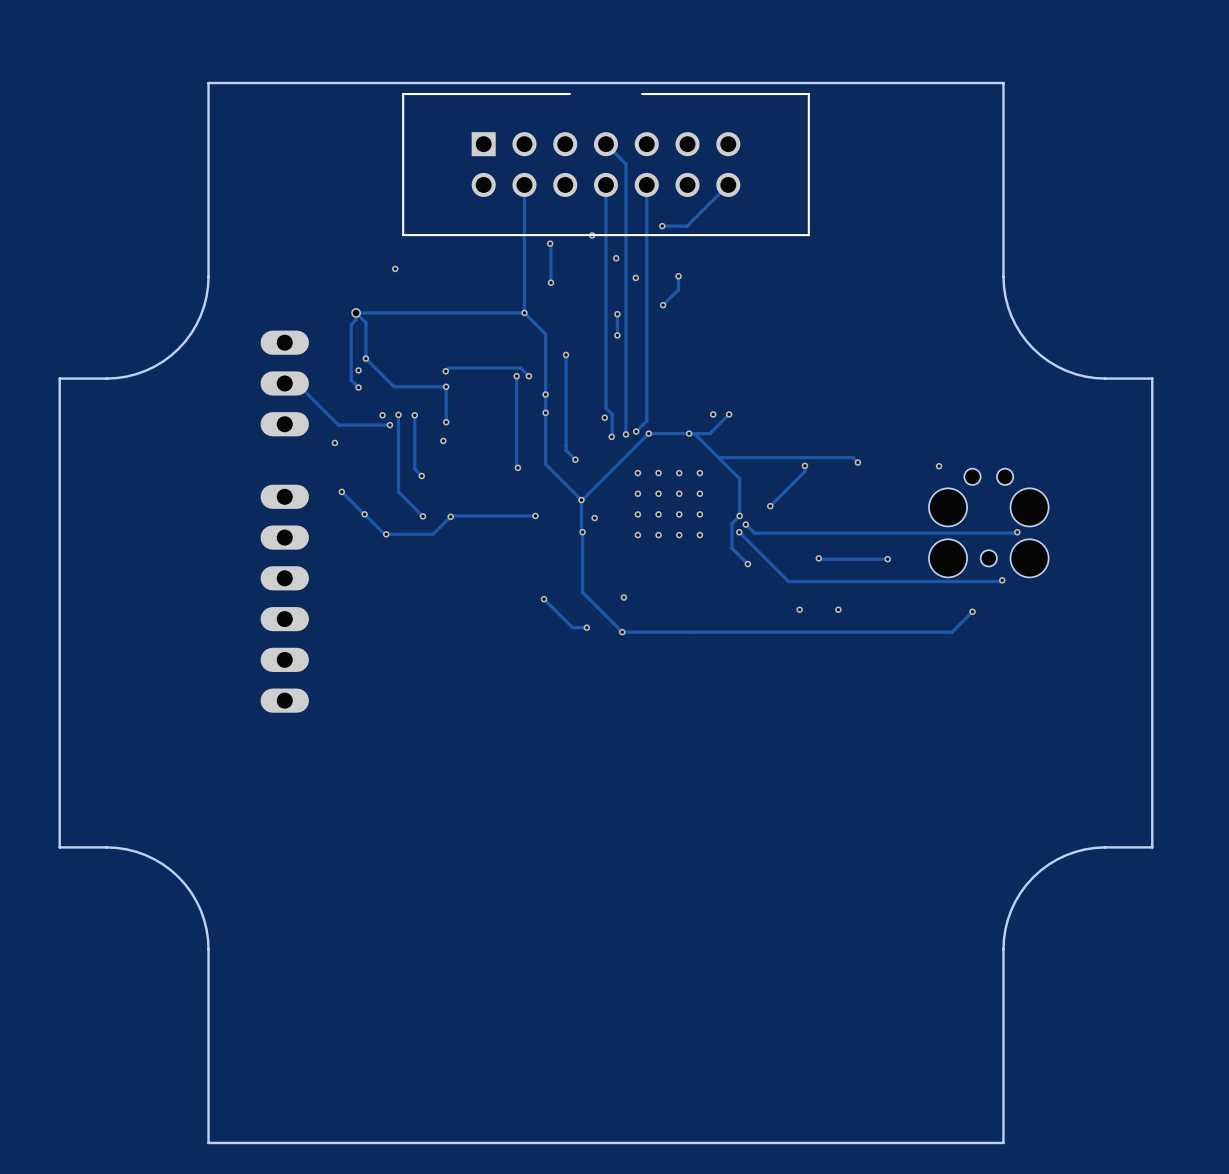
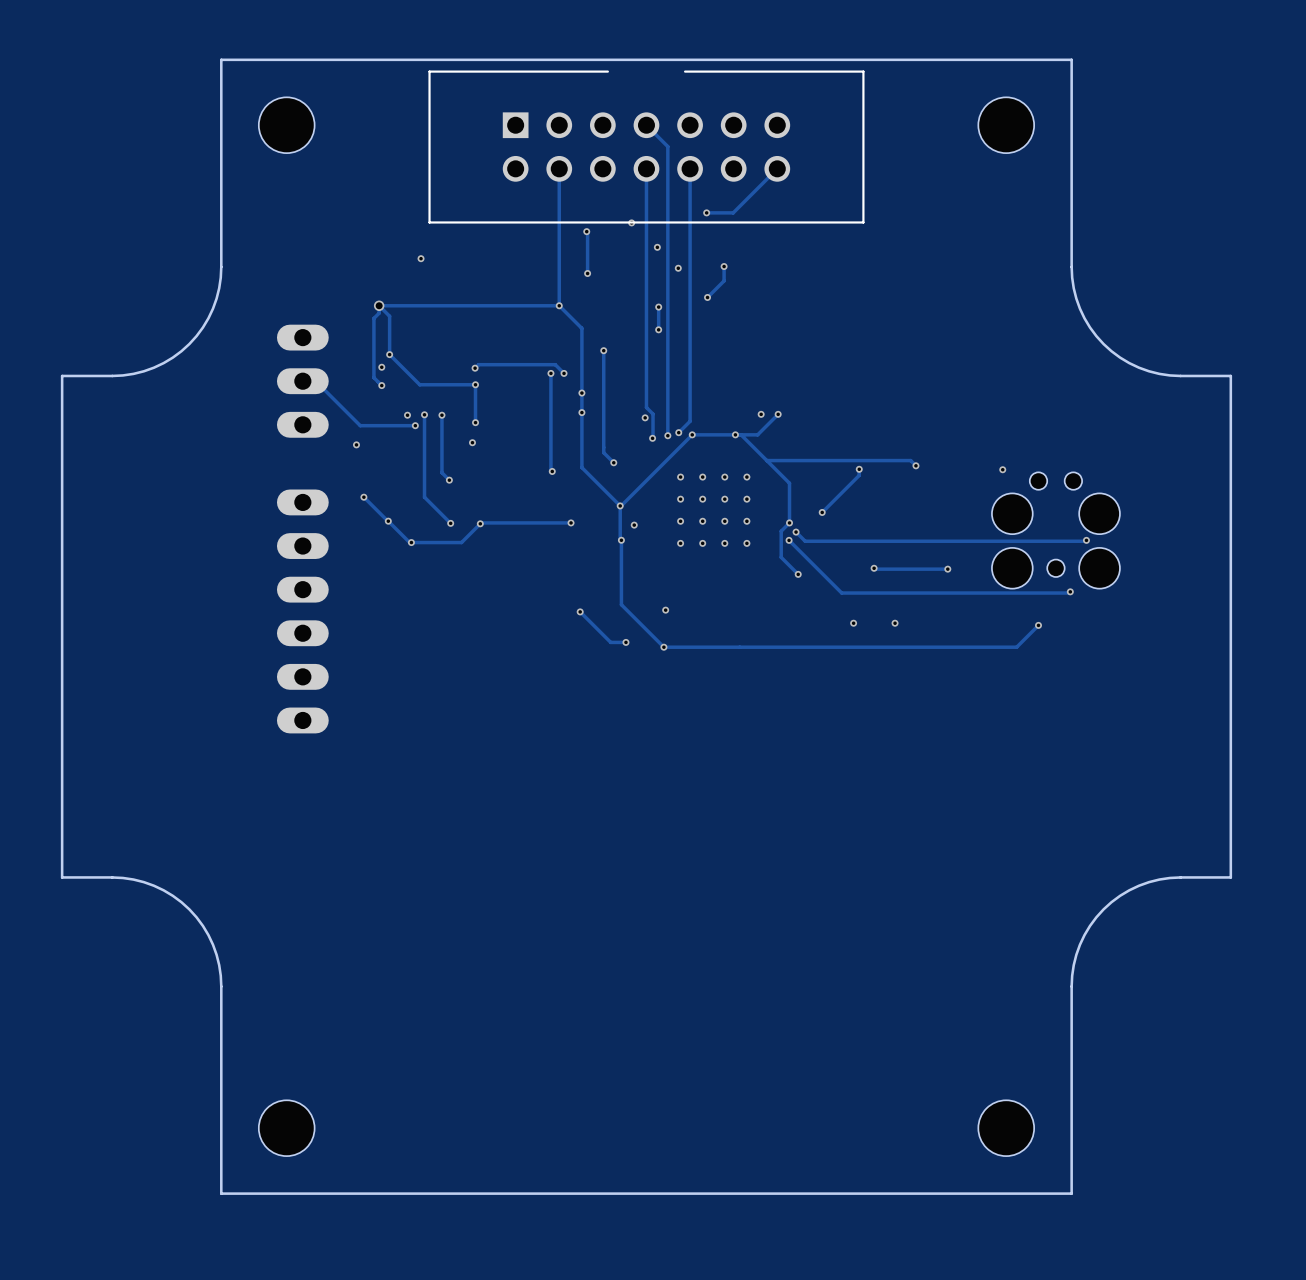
part: none -> (286, 125)
part: none -> (1006, 125)
part: none -> (286, 1128)
part: none -> (1006, 1128)

